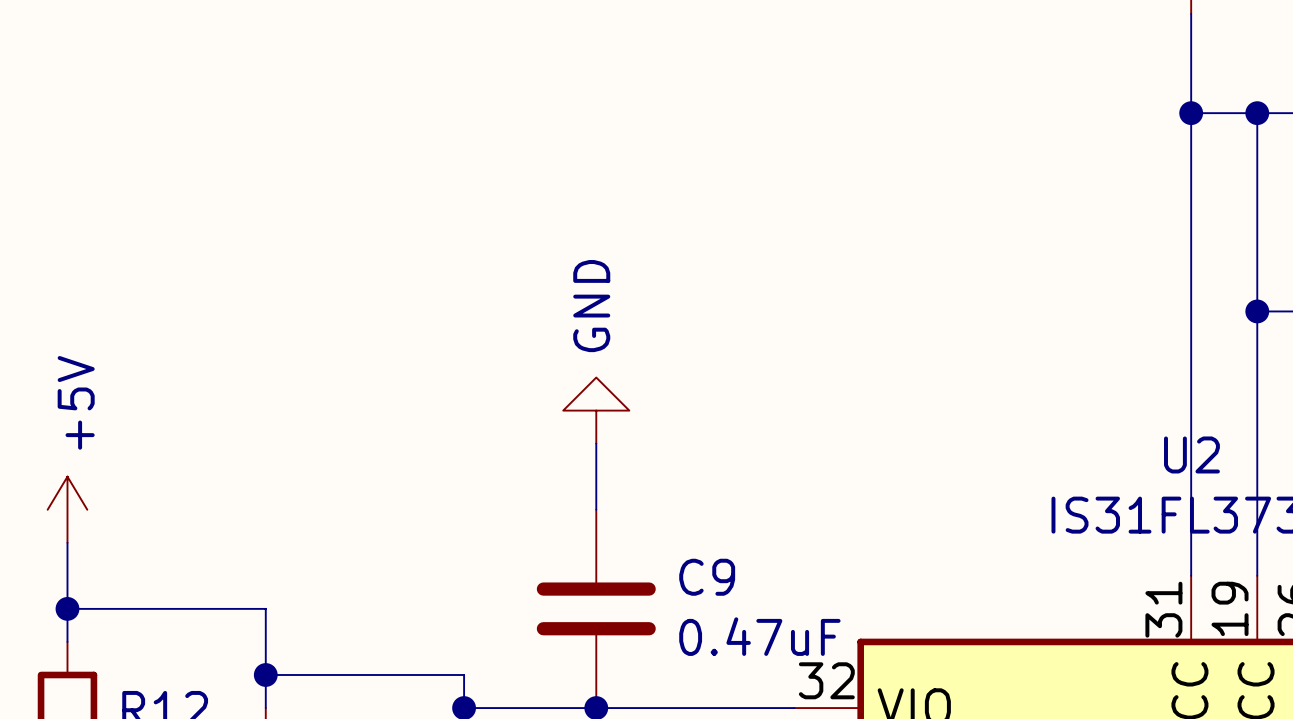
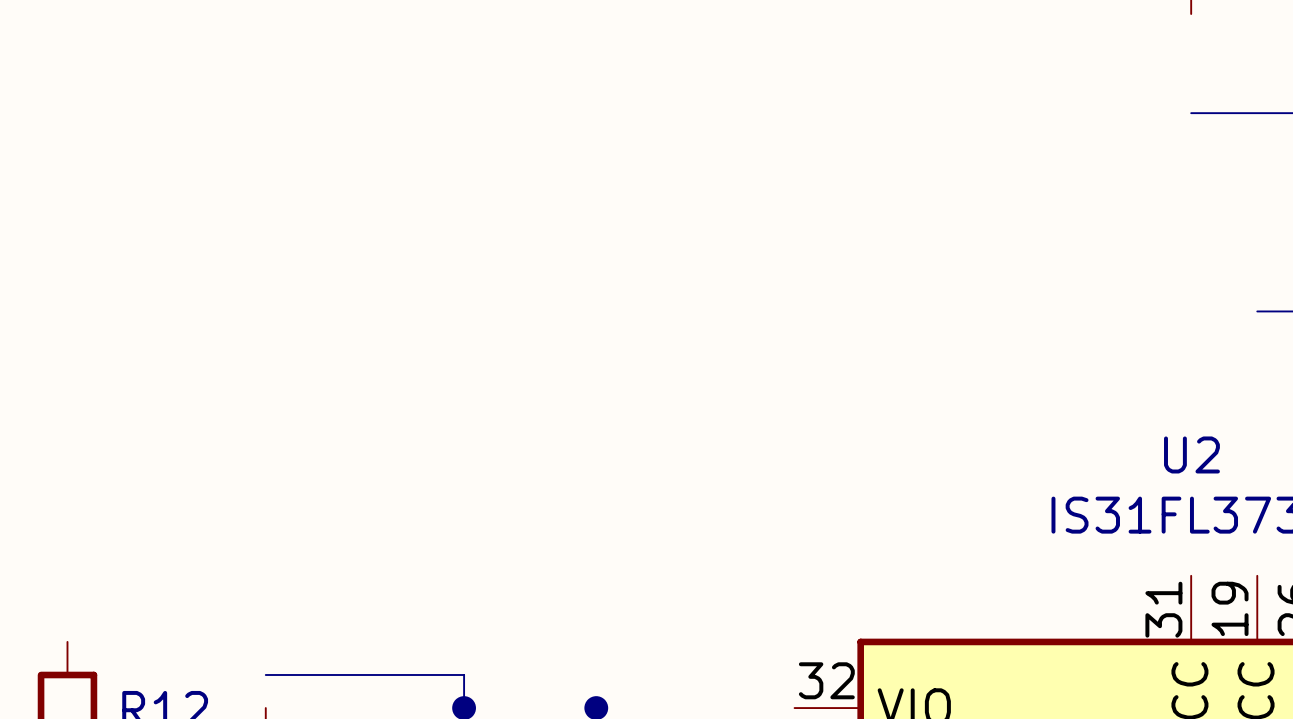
wire: (1191, 14) (1191, 575) -> none
junction: (1191, 113) -> none
wire: (1257, 113) (1257, 575) -> none
junction: (1257, 113) -> none
junction: (1257, 311) -> none
power symbol: GND (596, 410) -> none
wire: (596, 443) (596, 509) -> none
power symbol: +5V (67, 509) -> none
wire: (67, 542) (67, 641) -> none
wire: (67, 608) (265, 608) (265, 708) -> none
junction: (67, 608) -> none
C9: 0.47uF (596, 608) -> none
junction: (265, 674) -> none
wire: (464, 708) (794, 708) -> none

